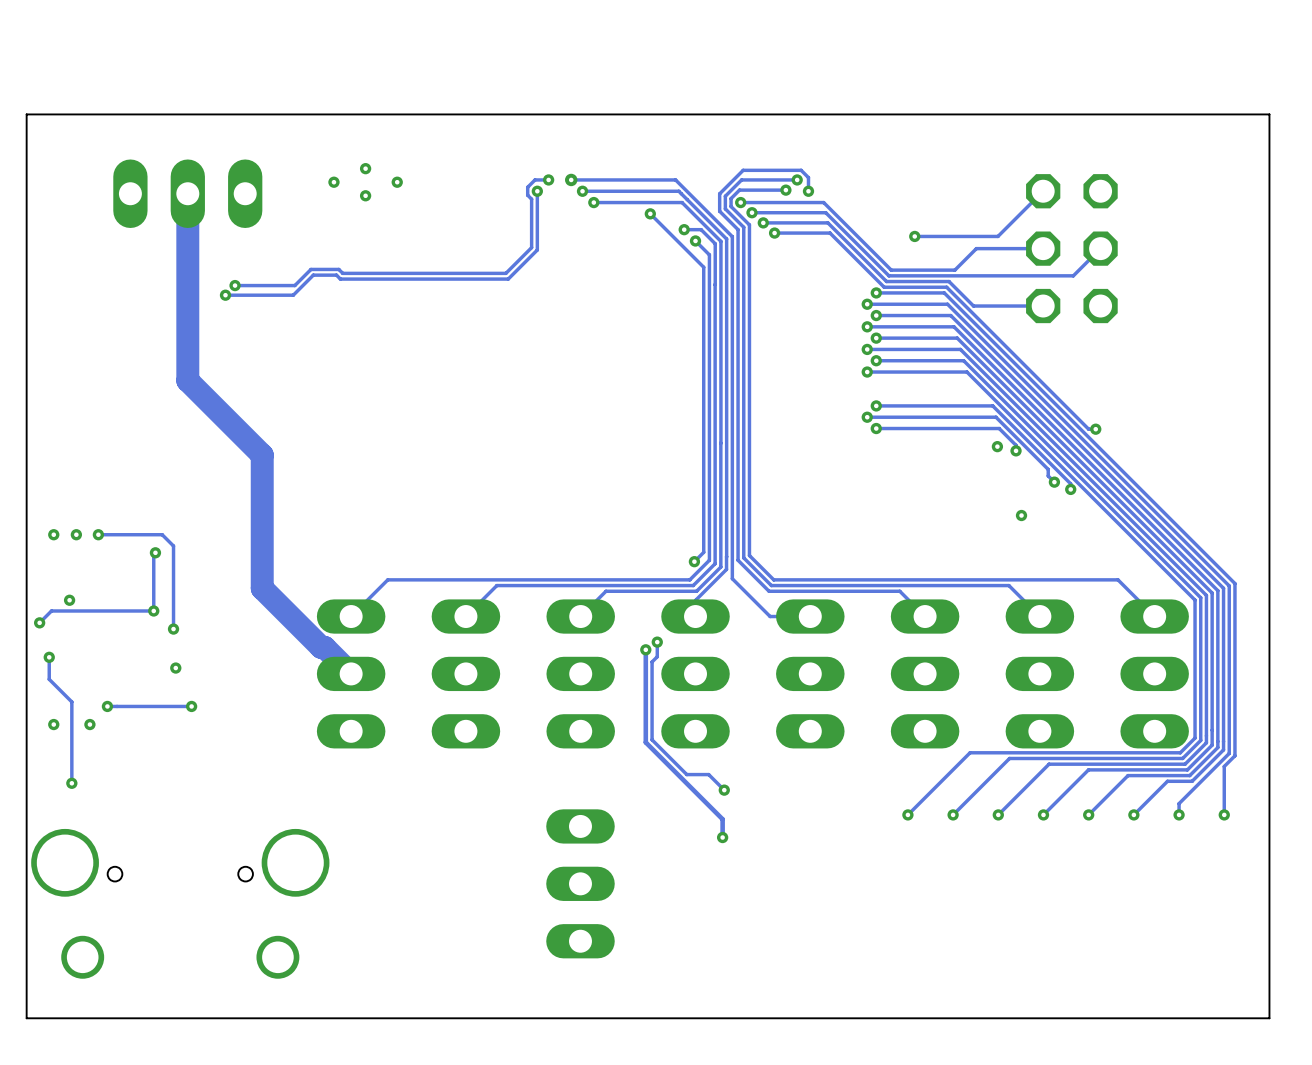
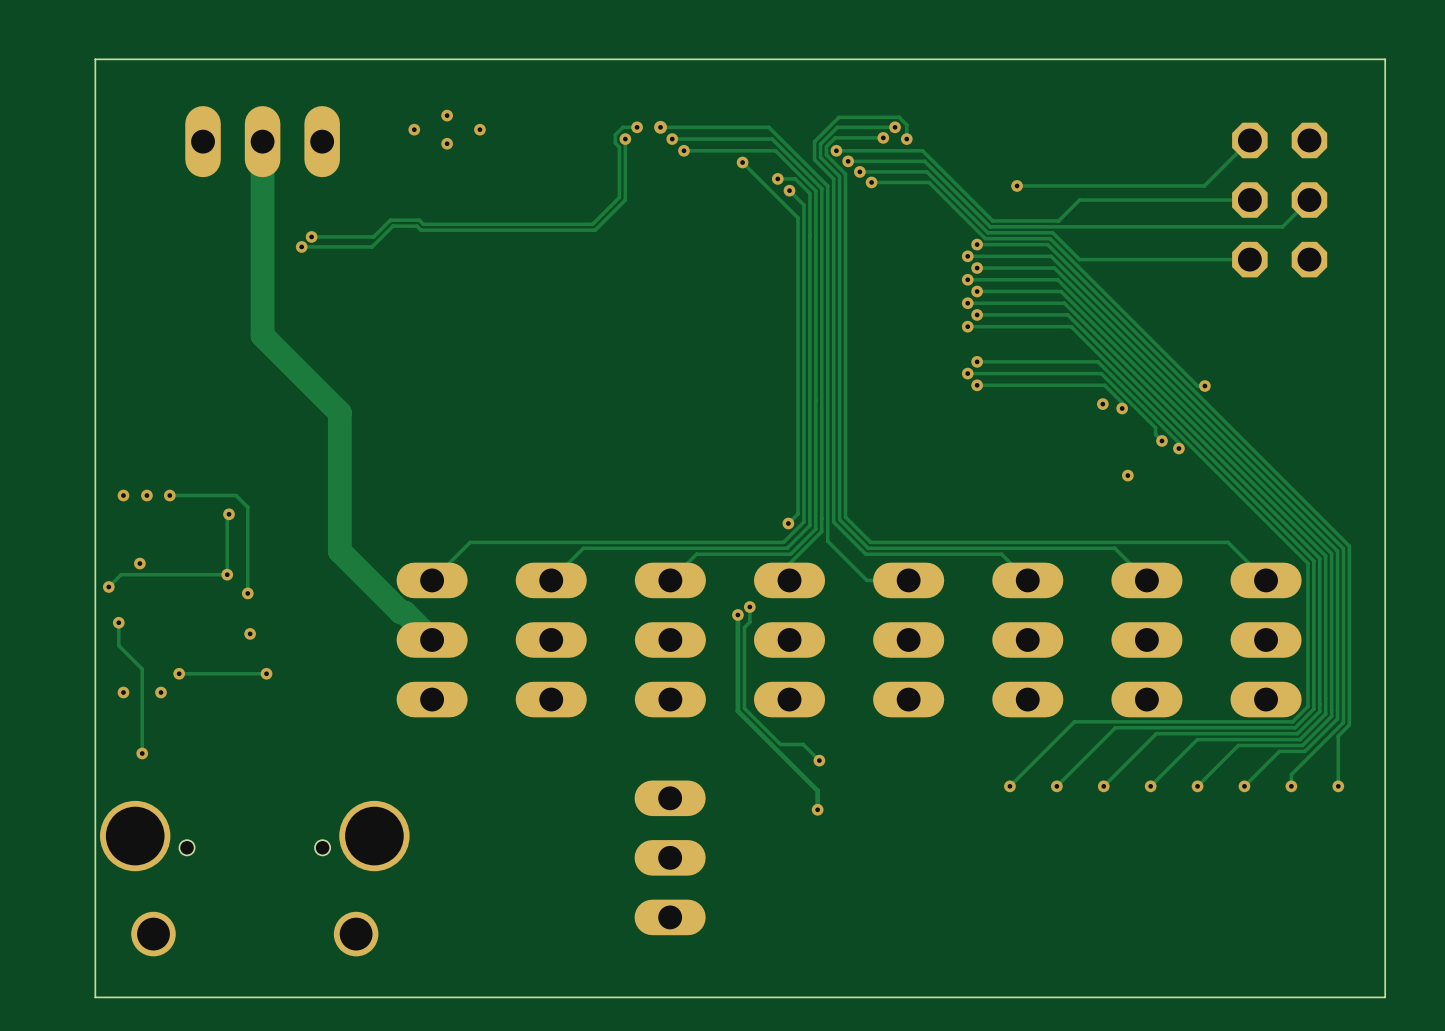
track: (1043, 191) (997, 236) -> (1249, 140) (1204, 185) (1103, 185)
track: (1043, 248) (975, 250) -> (1249, 200) (1079, 200)
part position: (1071, 248) -> (1279, 200)
track: (1100, 248) (1073, 275) -> (1309, 200) (1282, 226) (1181, 226)
track: (1043, 306) (973, 306) -> (1249, 259) (1078, 258)

